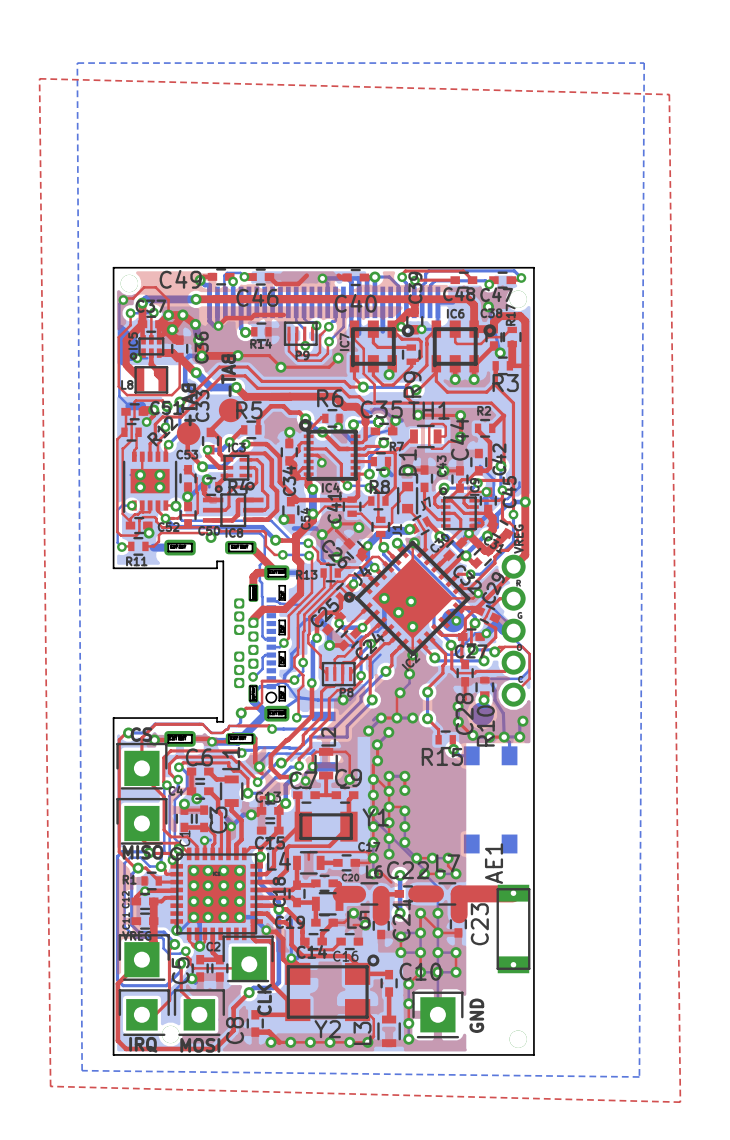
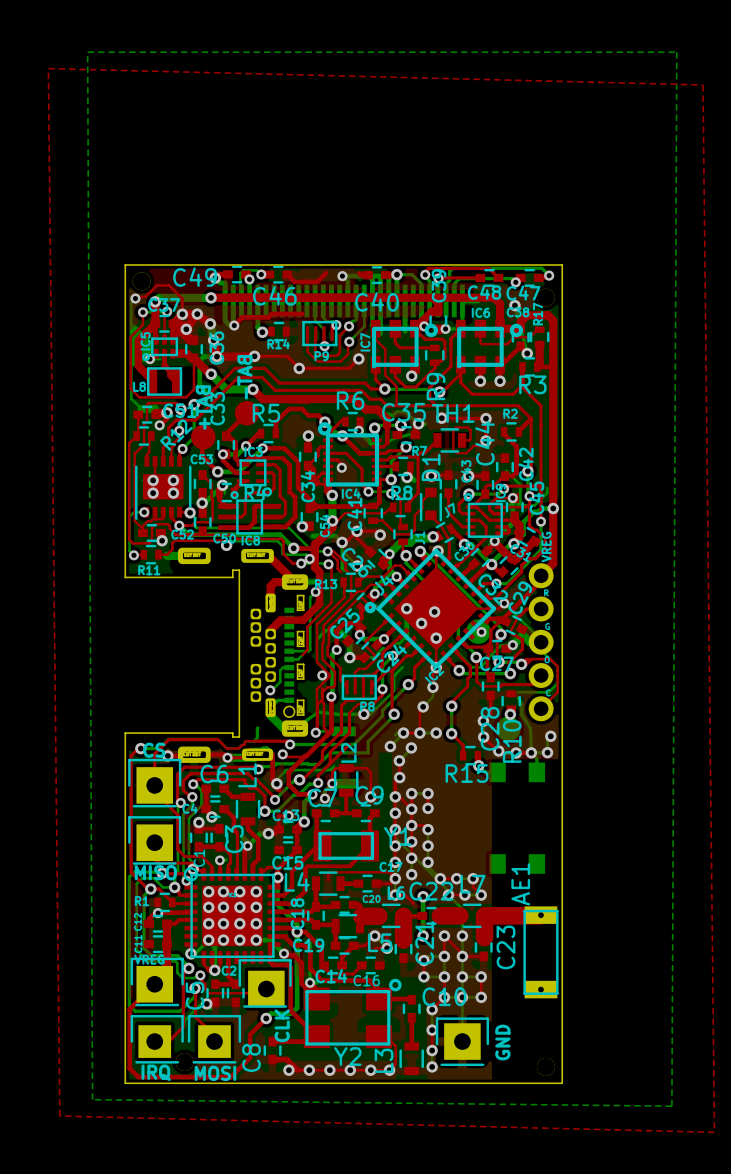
bottom track: (264, 545) (264, 560) (259, 565) (259, 580) (262, 583) (262, 636) (265, 639) (271, 639) -> (315, 591) (310, 597) (310, 649) (289, 651)
bottom track: none -> (282, 553) (306, 554) (309, 558)
via: none -> (309, 558)
top track: (321, 563) (328, 563) -> (333, 551) (345, 563) (345, 569) (348, 572)
via: none -> (315, 591)
bottom track: (271, 599) (279, 603) (300, 604) -> none
top track: (299, 612) (297, 614) (297, 654) (294, 657) (294, 666) (302, 675) -> (318, 623) (317, 662) (329, 676) (316, 689) (316, 731)
bottom track: (298, 627) (298, 647) (291, 653) (291, 668) (285, 675) (283, 681) -> none
via: (283, 643) -> none
top track: (303, 647) (303, 662) -> (322, 659) (334, 671) (334, 685) (327, 687) (322, 692) (322, 700)
bottom track: (303, 662) (303, 671) (294, 680) -> none
top track: (294, 680) (262, 681) -> none
via: (294, 680) -> none
top track: (262, 681) (262, 703) (256, 708) -> none
bottom track: (271, 686) (284, 682) (296, 697) (299, 697) -> none
top track: none -> (322, 700) (323, 728) (326, 735) (304, 756) (285, 756) (282, 754)
top track: (256, 708) (246, 708) (241, 713) -> none
via: (241, 713) -> none
via: none -> (282, 754)
top track: (310, 747) (299, 758) -> (349, 744) (318, 775)

